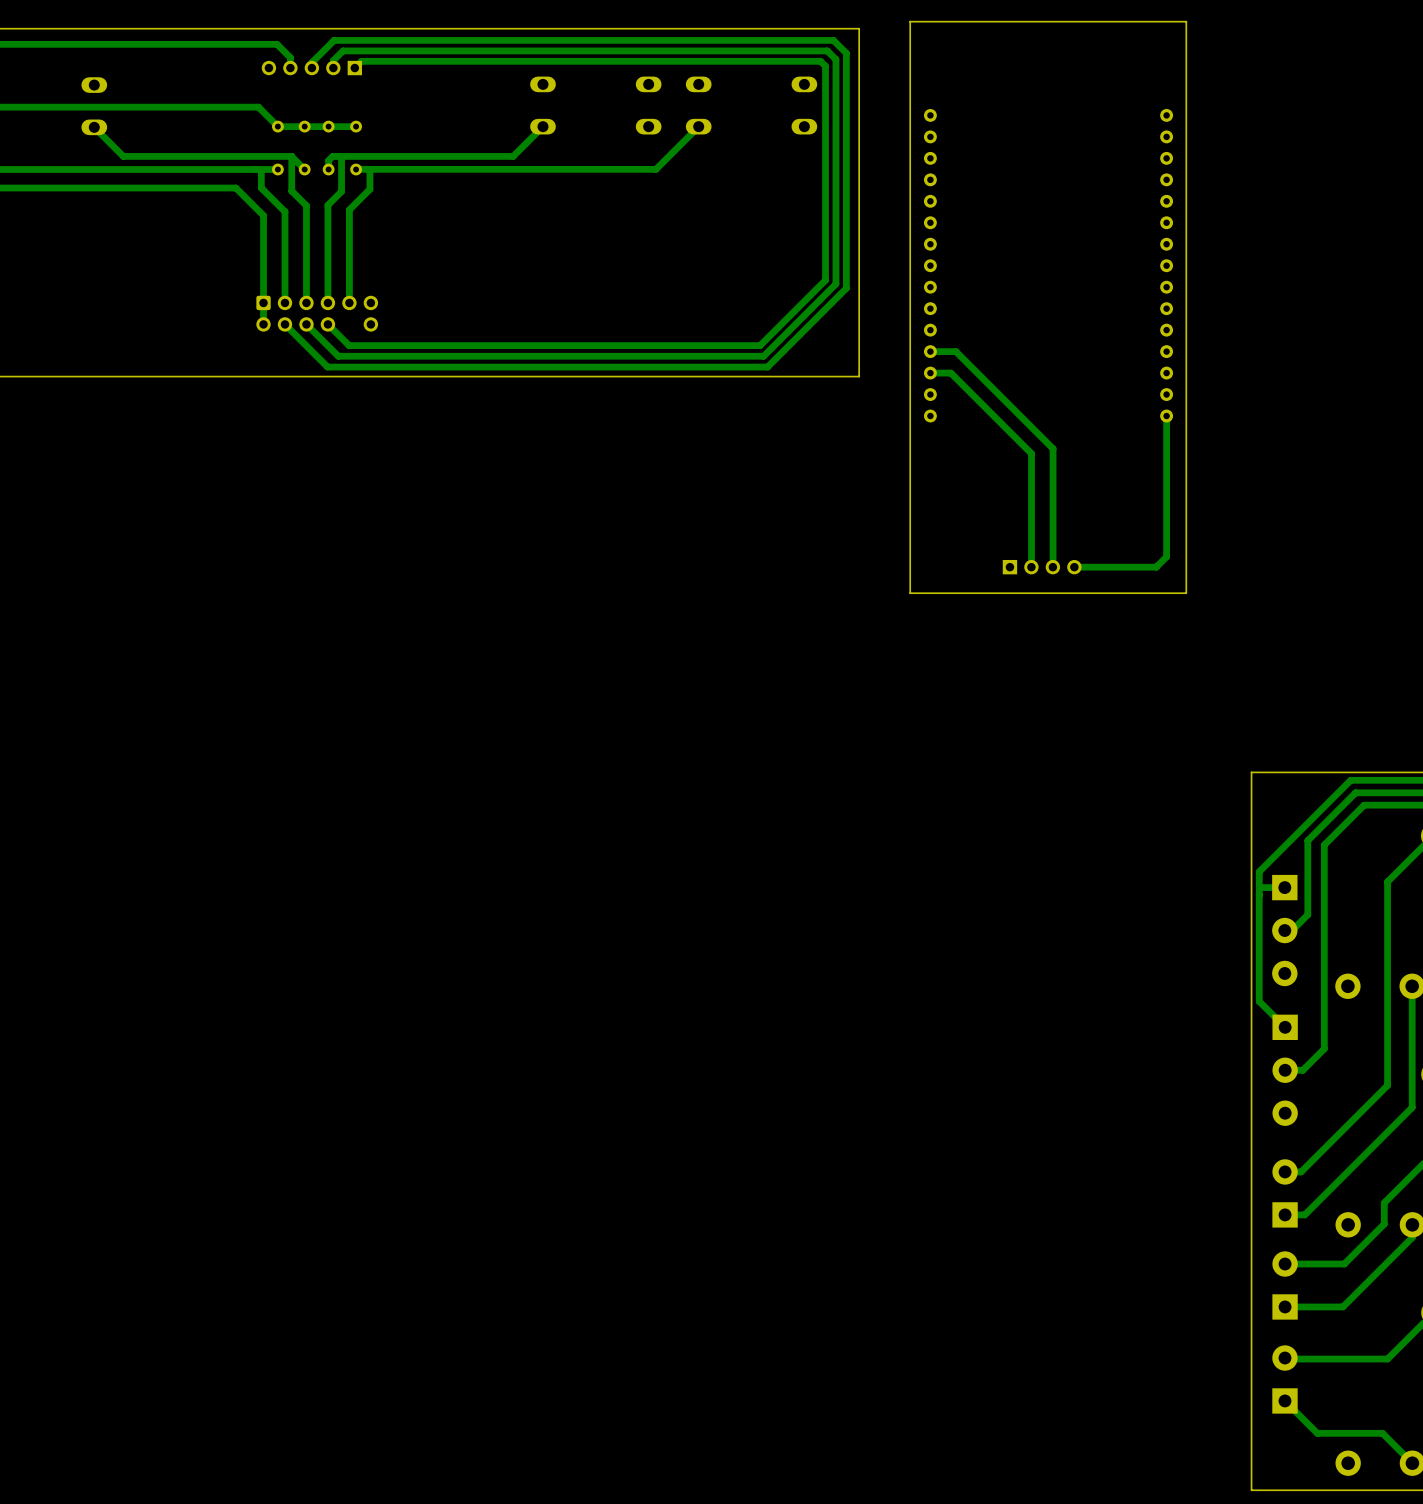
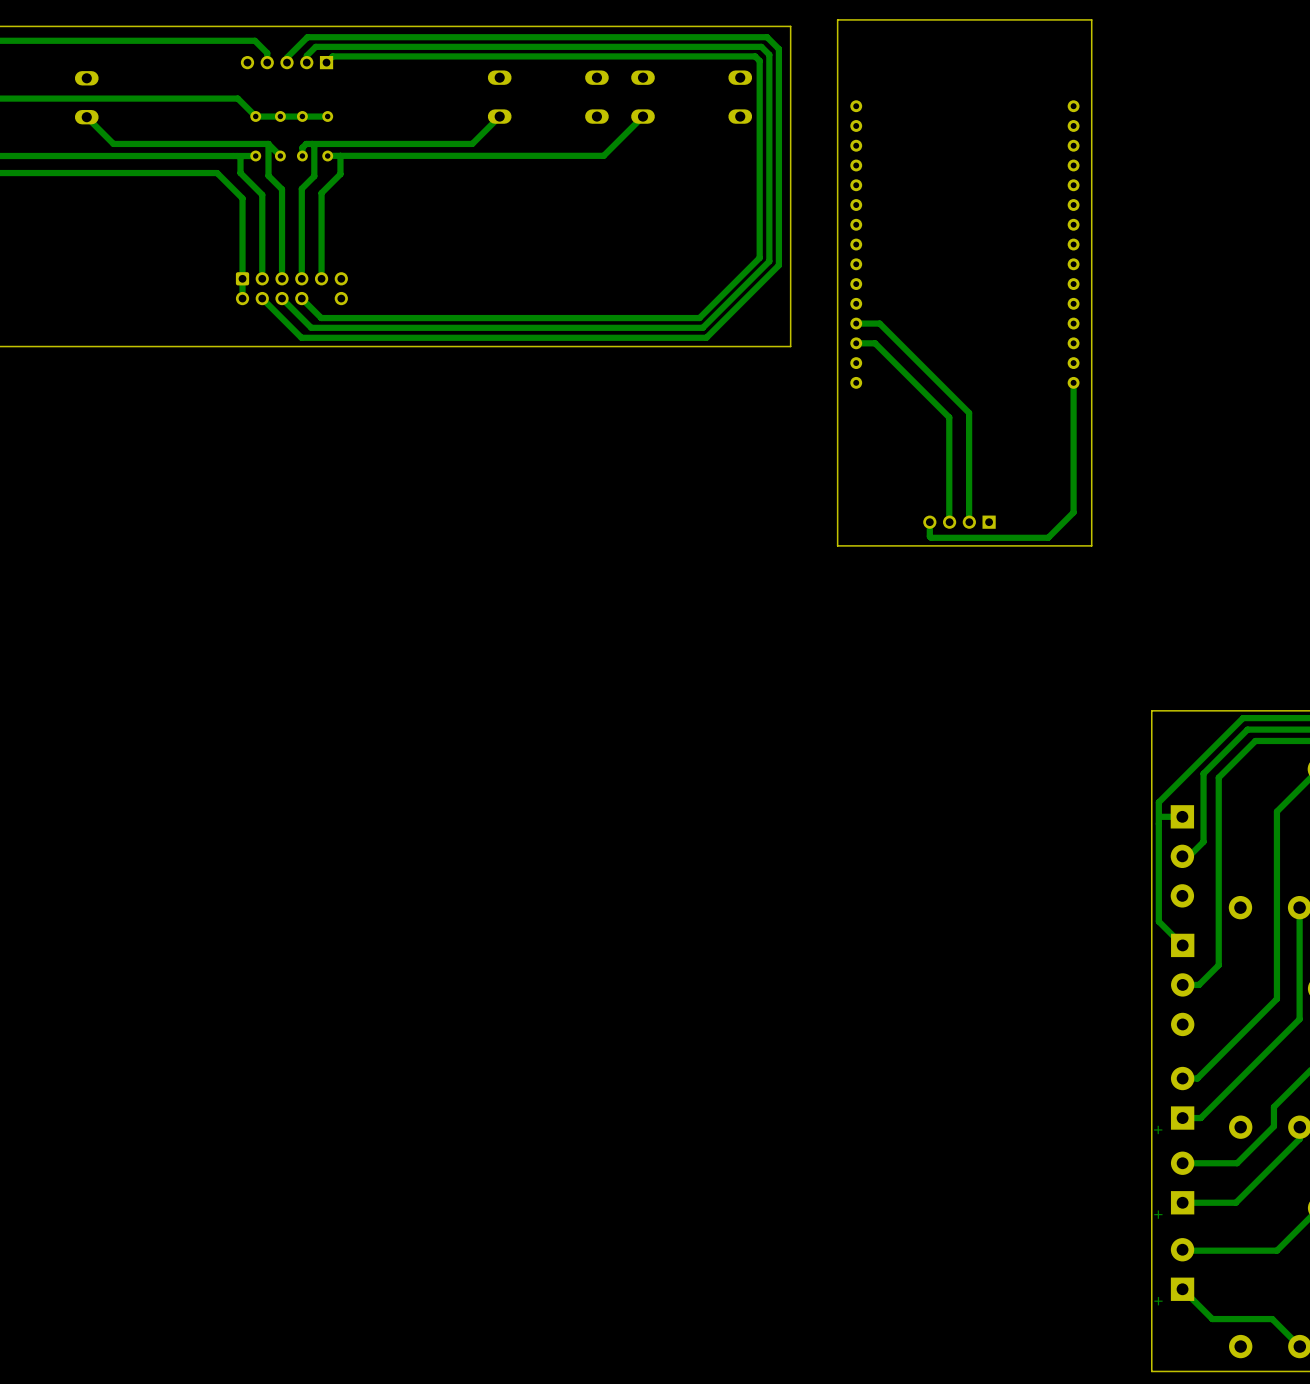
part rotation: 0° (1042, 567) -> 180° (959, 522)
track: (1156, 567) (1074, 567) -> (1064, 521) (1048, 537) (931, 537) (929, 522)
text: none -> + (1158, 1129)
text: none -> + (1158, 1214)
text: none -> + (1158, 1301)

